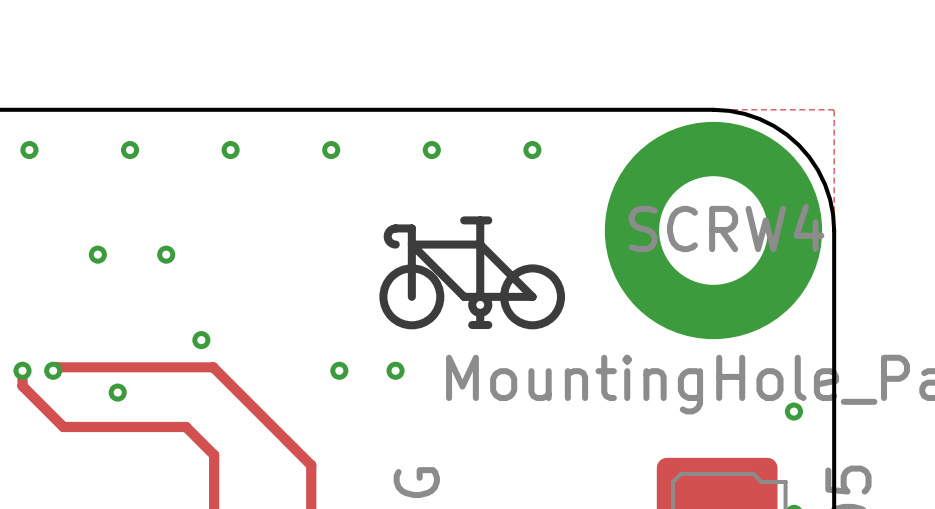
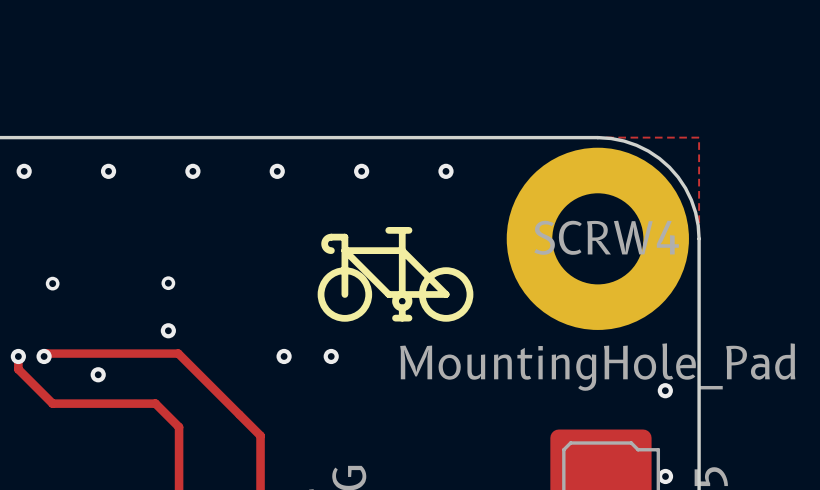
via: (97, 254) -> none
via: (166, 254) -> none
via: none -> (52, 283)
via: none -> (168, 283)

